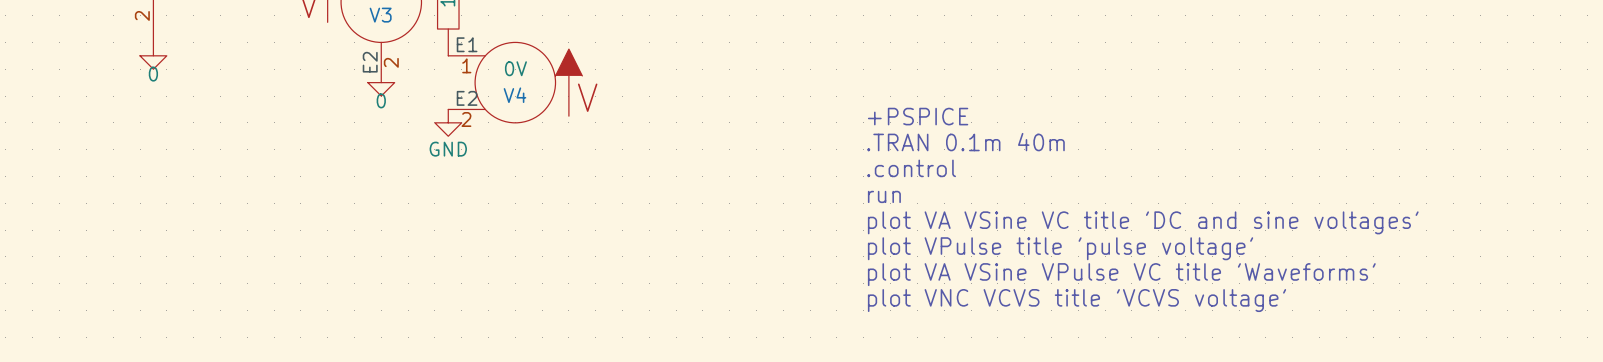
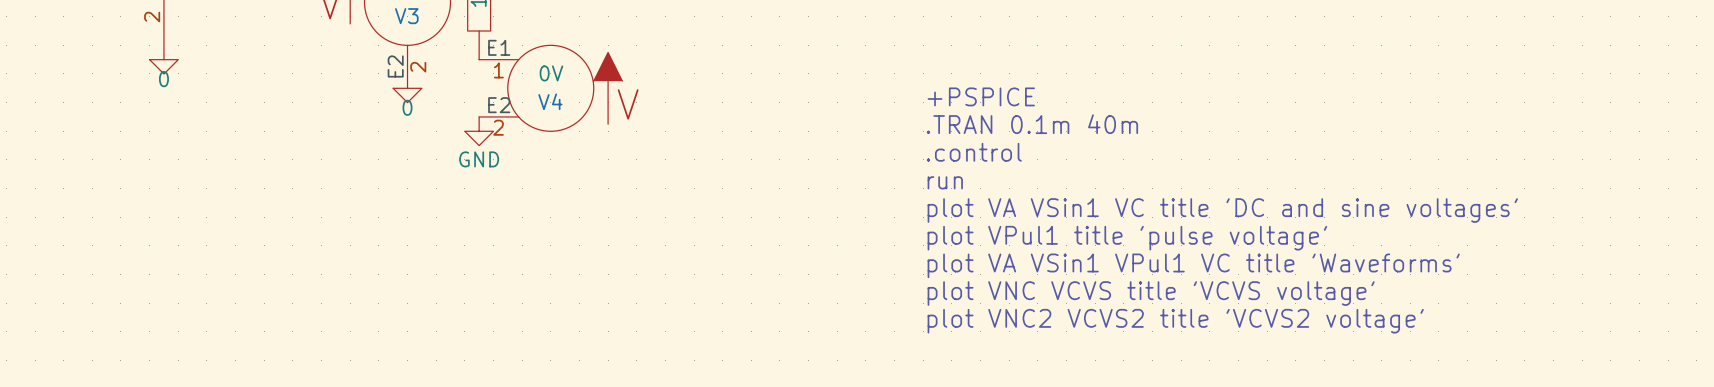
text: none -> +PSPICE (981, 96)
text: +PSPICE (918, 116) -> .TRAN 0.1m 40m (1032, 124)
text: .TRAN 0.1m 40m (965, 142) -> .control (974, 152)
text: .control (911, 168) -> run (945, 182)
text: run (884, 196) -> plot VA VSin1 VC title 'DC and sine voltages' (1222, 210)
text: plot VA VSine VC title 'DC and sine voltages' (1143, 222) -> plot VPul1 title 'pulse voltage' (1127, 238)
text: plot VPulse title 'pulse voltage' (1060, 248) -> plot VA VSin1 VPul1 VC title 'Waveforms' (1193, 265)
text: plot VA VSine VPulse VC title 'Waveforms' (1121, 274) -> plot VNC VCVS title 'VCVS voltage' (1151, 293)
text: plot VNC VCVS title 'VCVS voltage' (1077, 300) -> plot VNC2 VCVS2 title 'VCVS2 voltage' (1175, 321)

